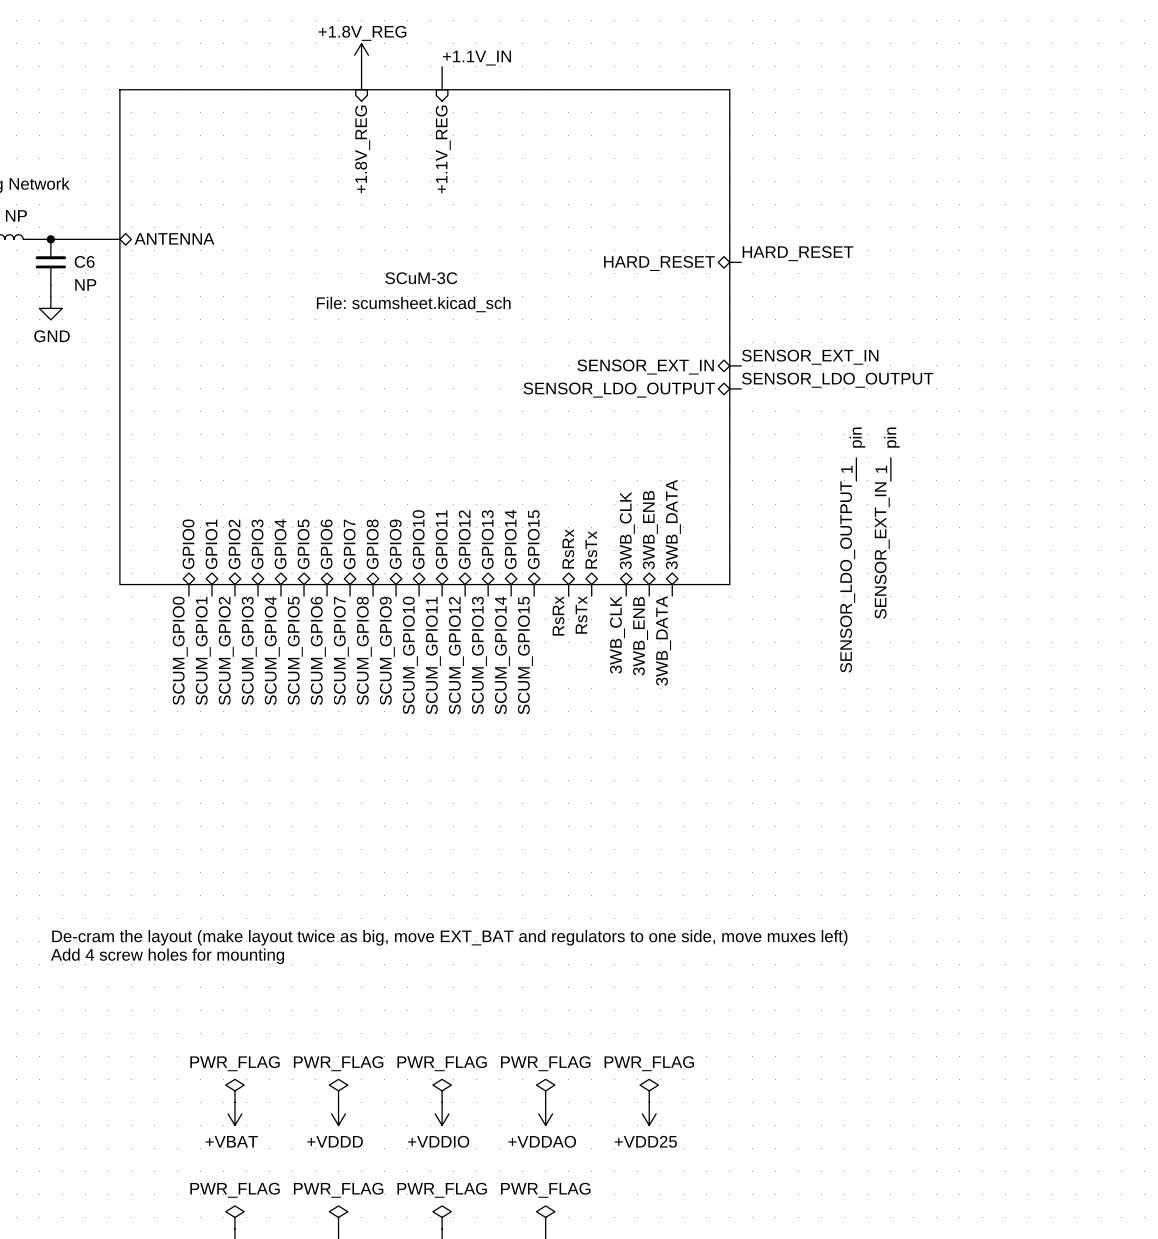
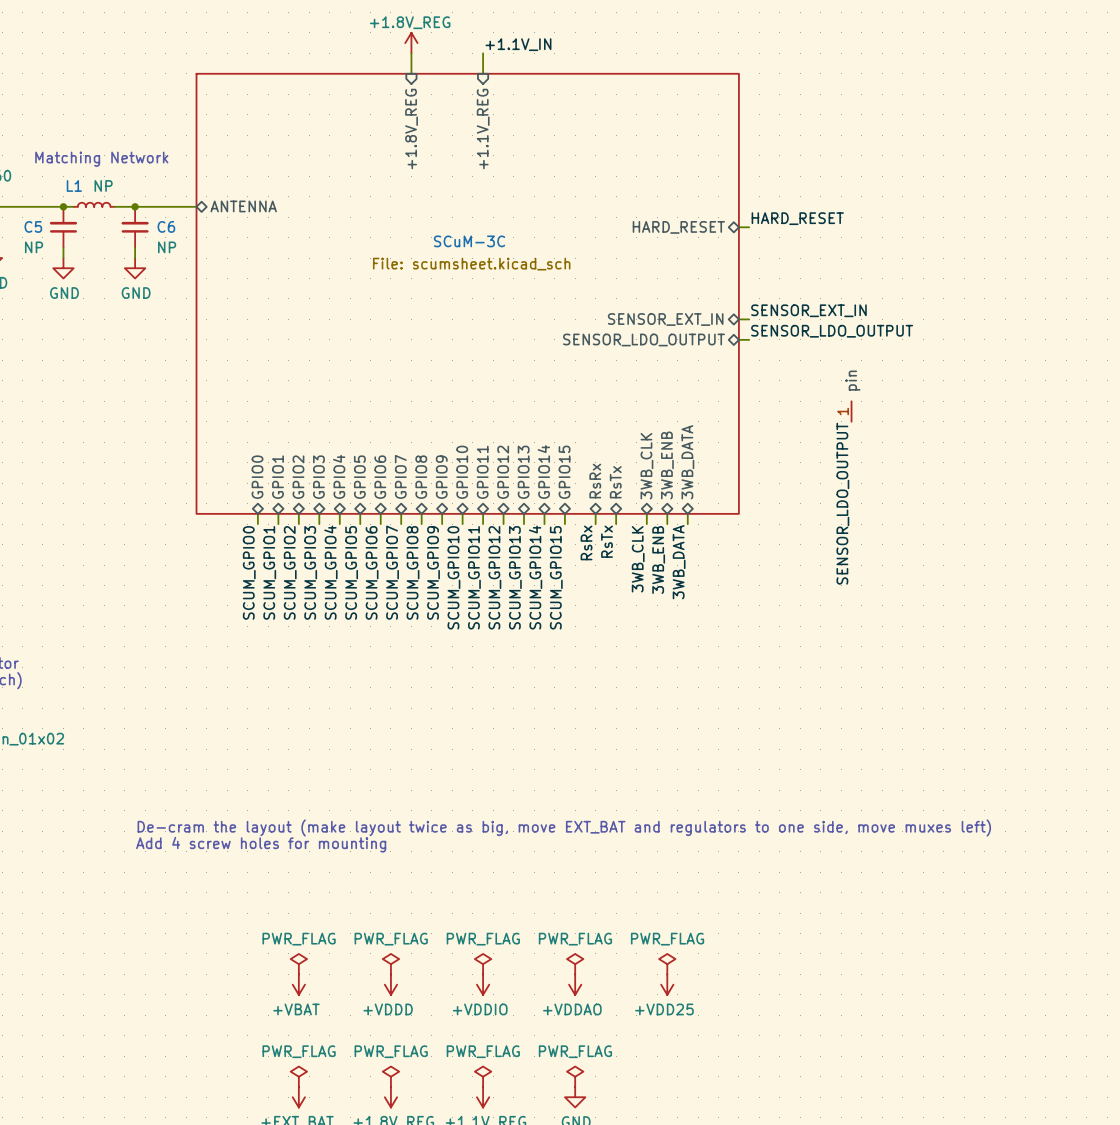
part: (890, 469) -> none
label: SENSOR_EXT_IN (882, 550) -> none

